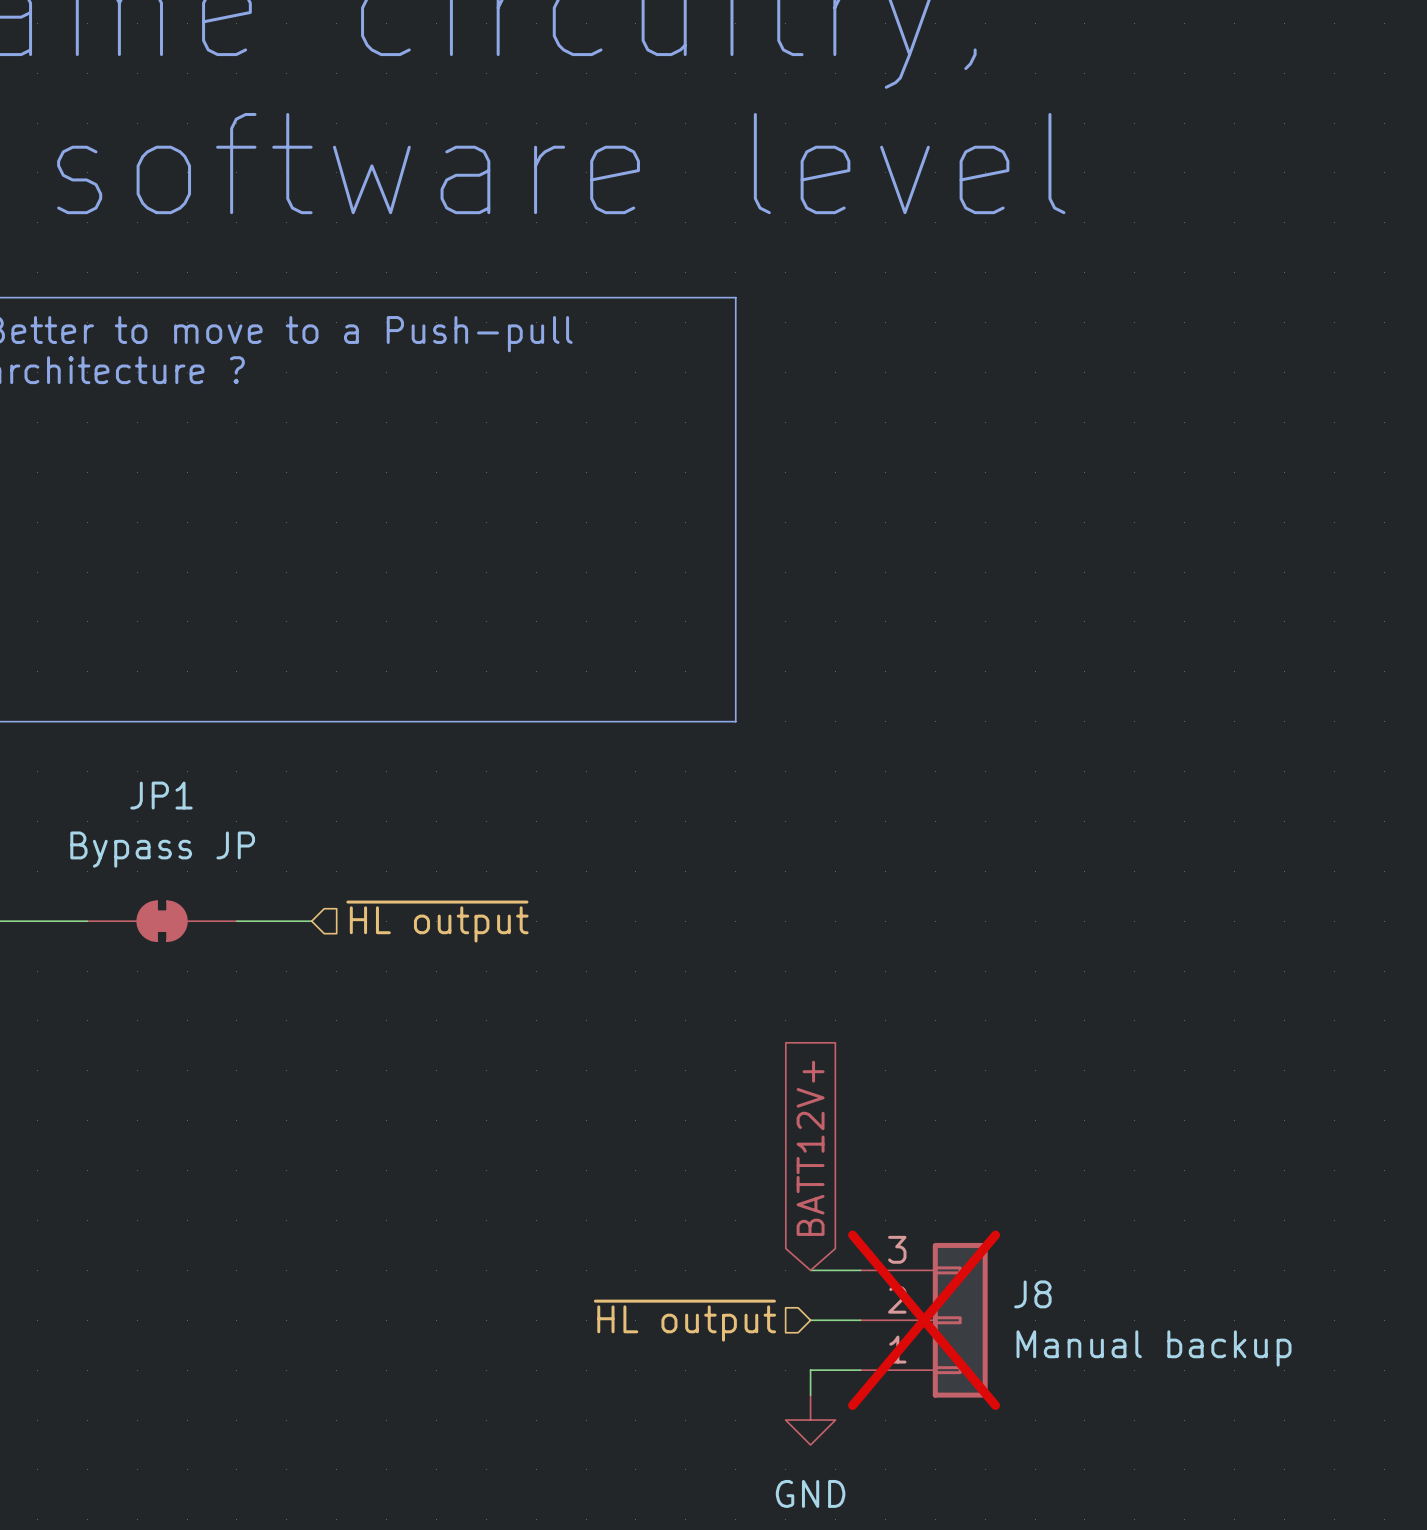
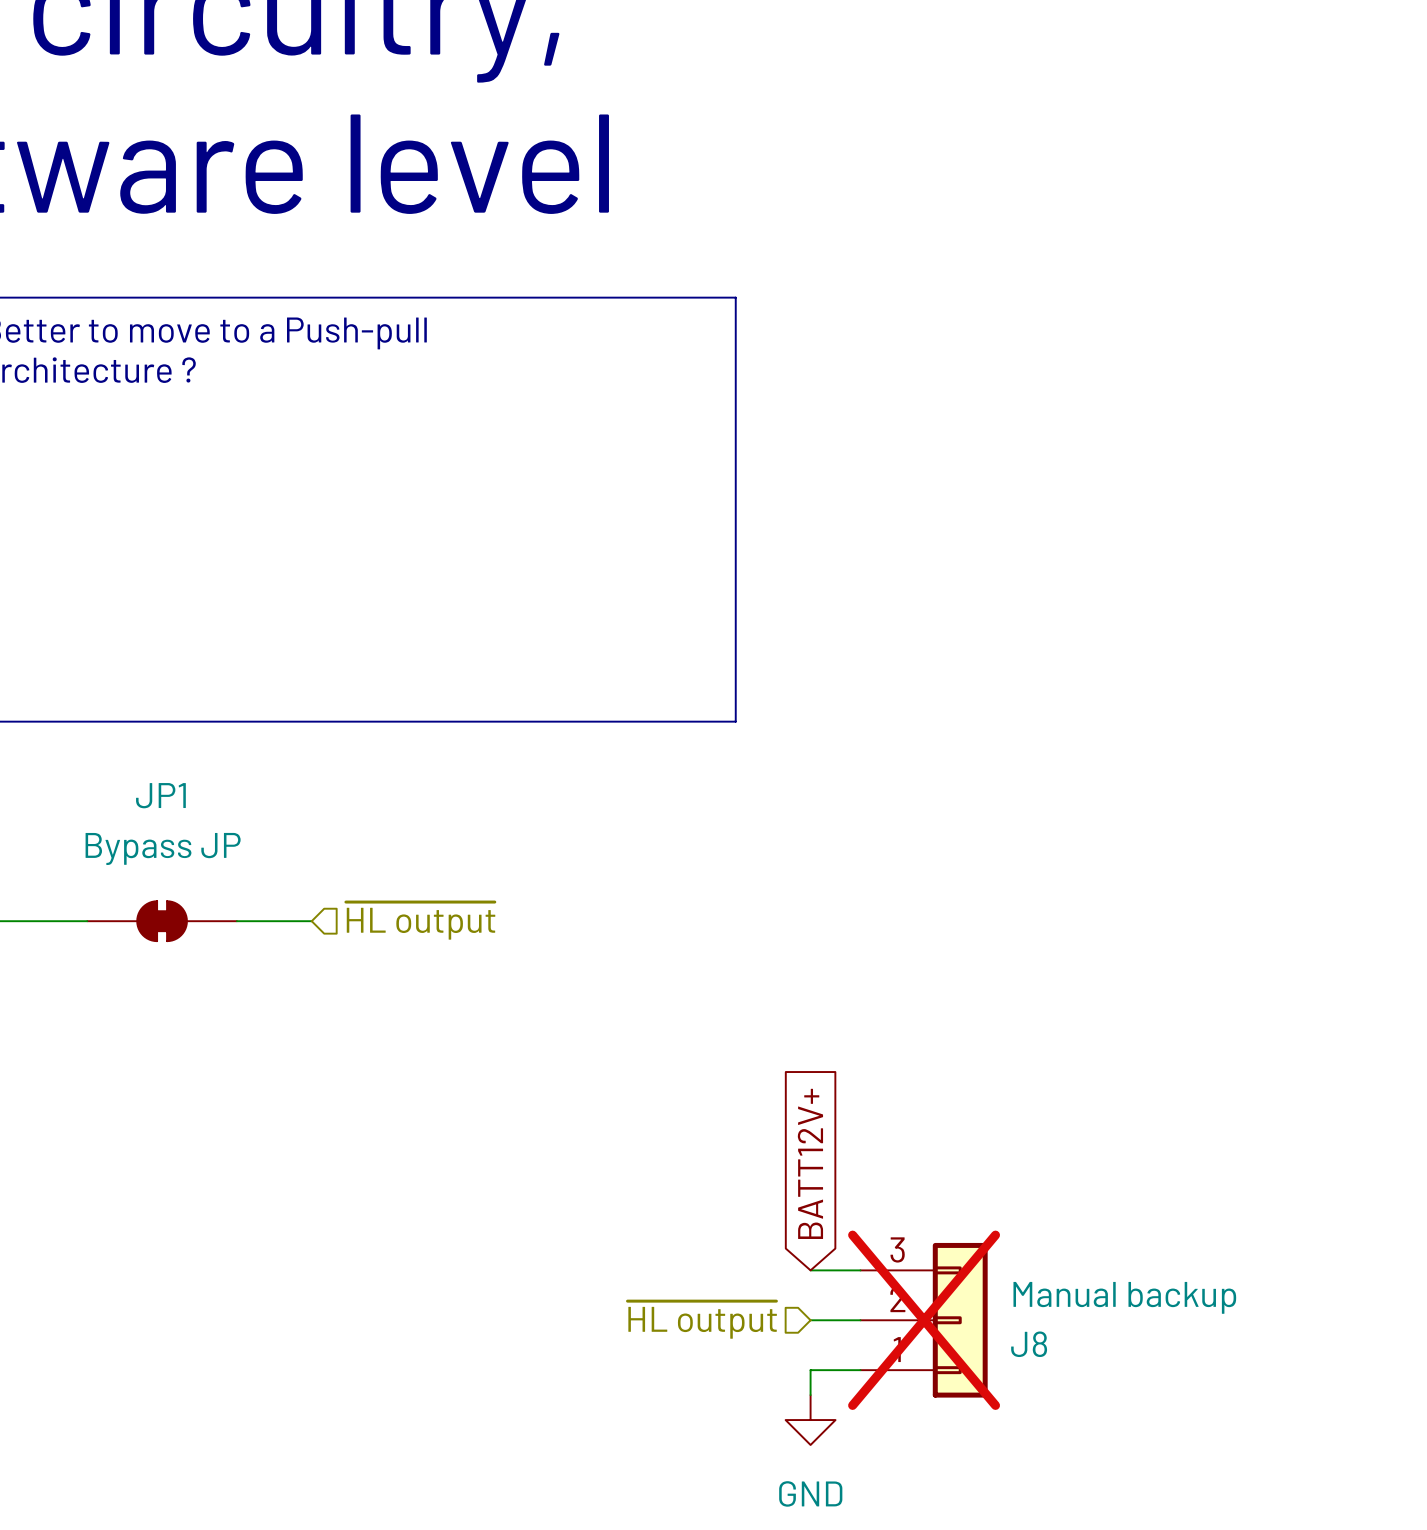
J8 name position: J8 (1032, 1294) -> J8 (1029, 1344)
J8 value position: Manual backup (1154, 1348) -> Manual backup (1124, 1297)

